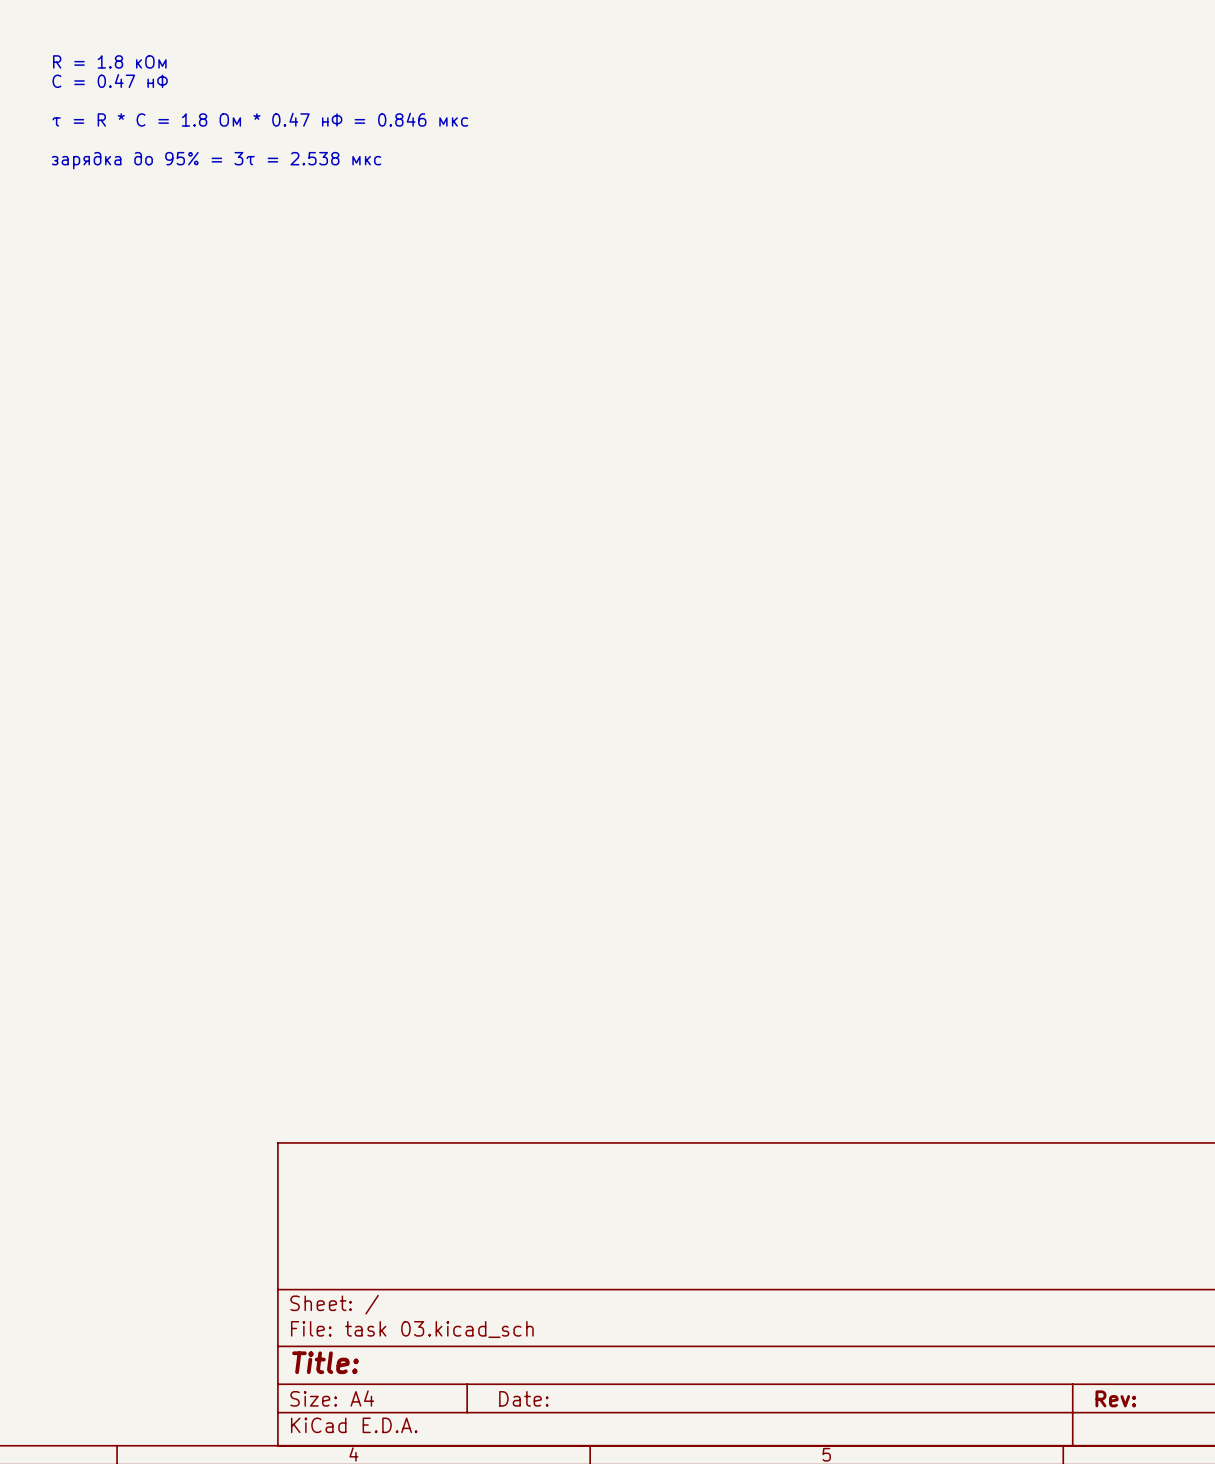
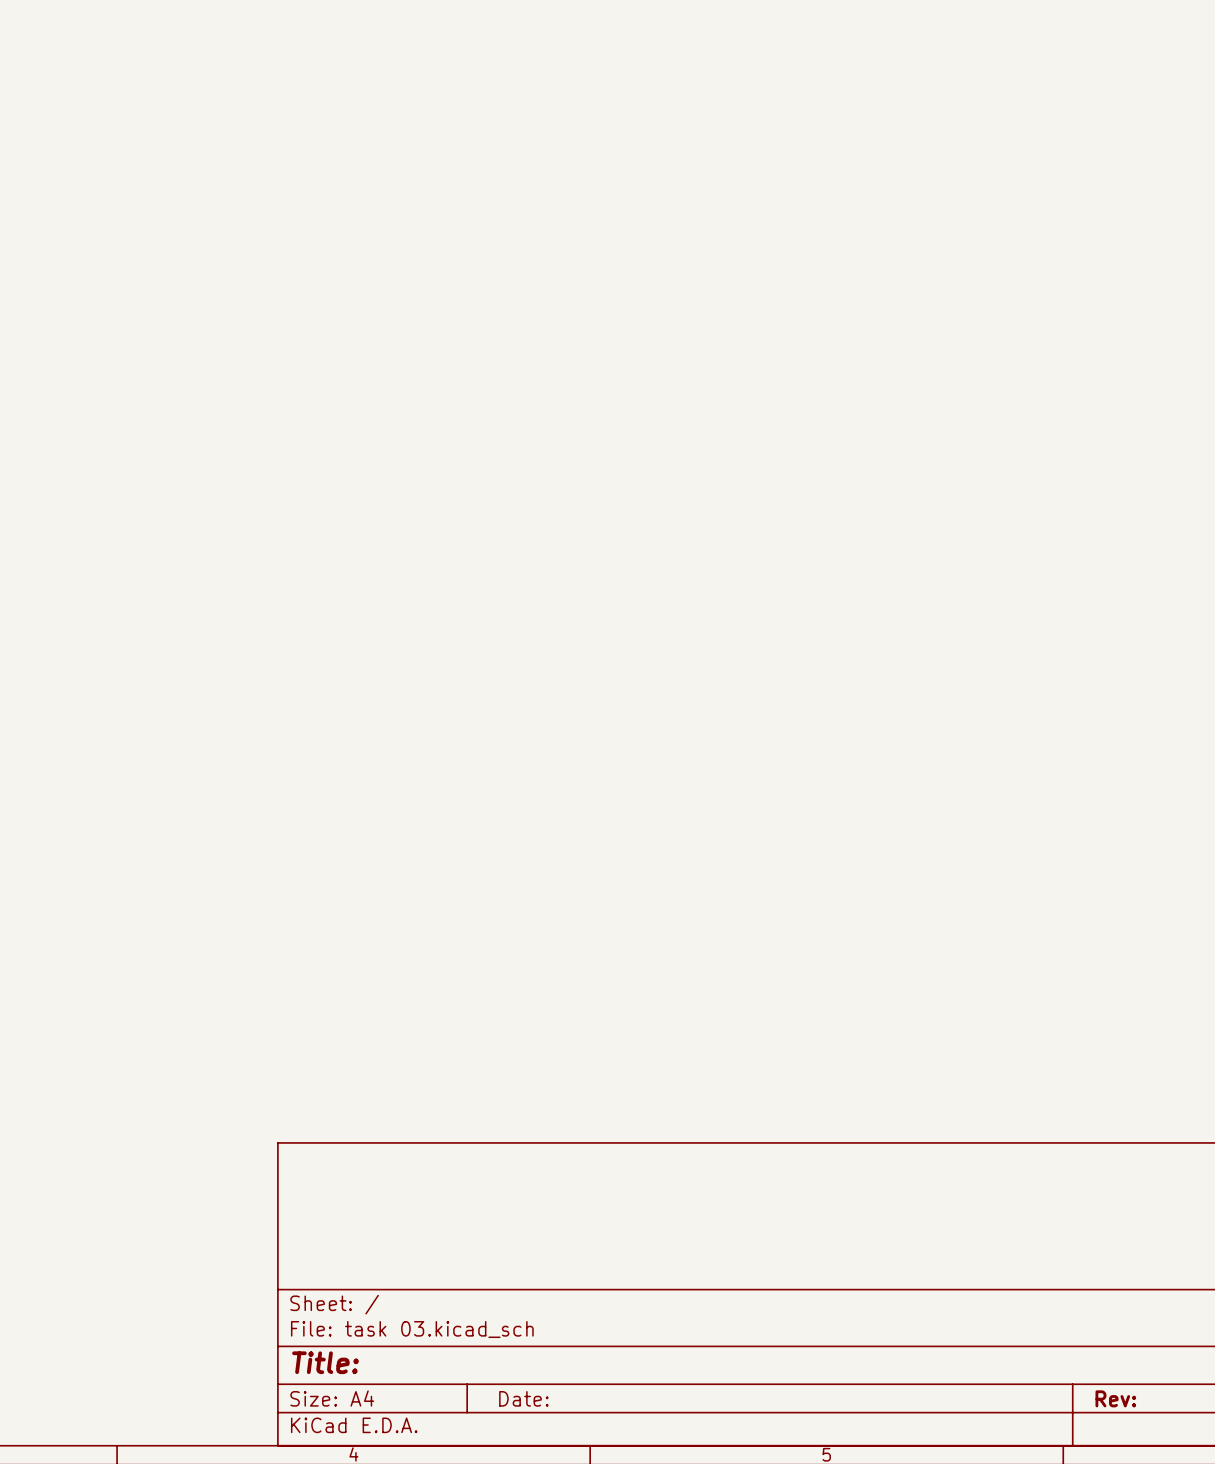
text: R = 1.8 кОм (109, 61) -> none
text: C = 0.47 нФ (110, 81) -> none
text: τ = R * C = 1.8 Ом * 0.47 нФ = 0.846 мкс (260, 119) -> none
text: зарядка до 95% = 3τ = 2.538 мкс (216, 160) -> none

